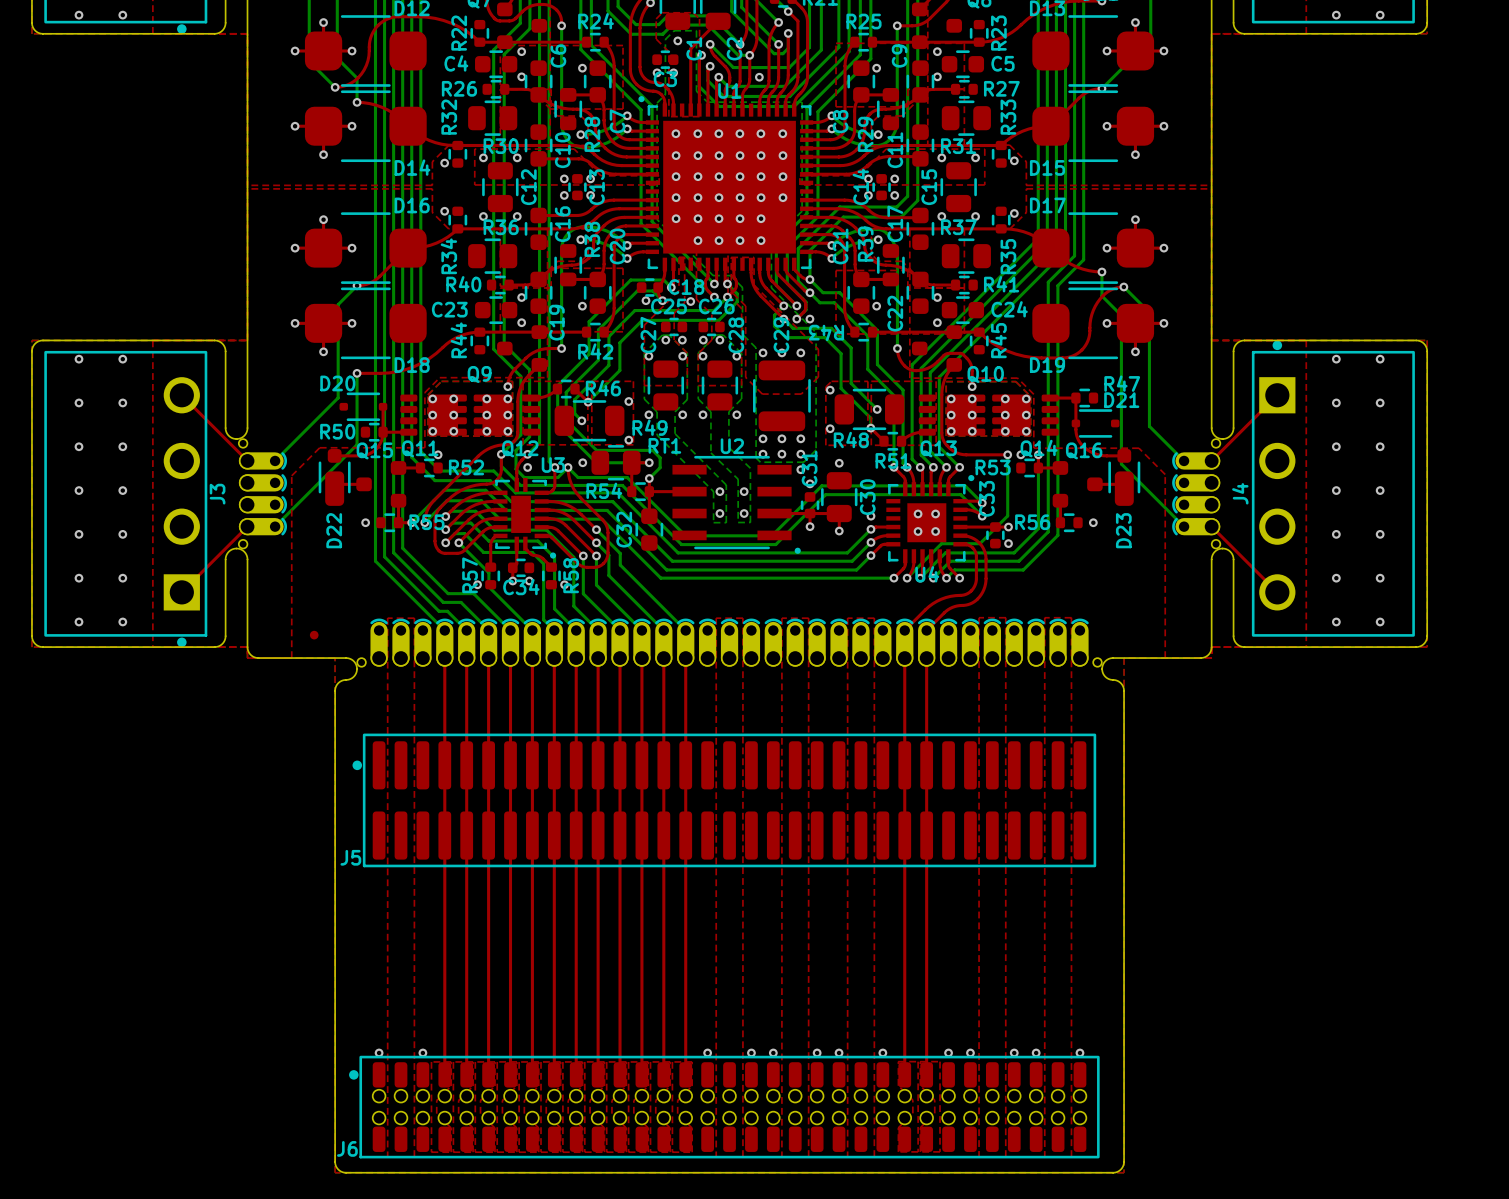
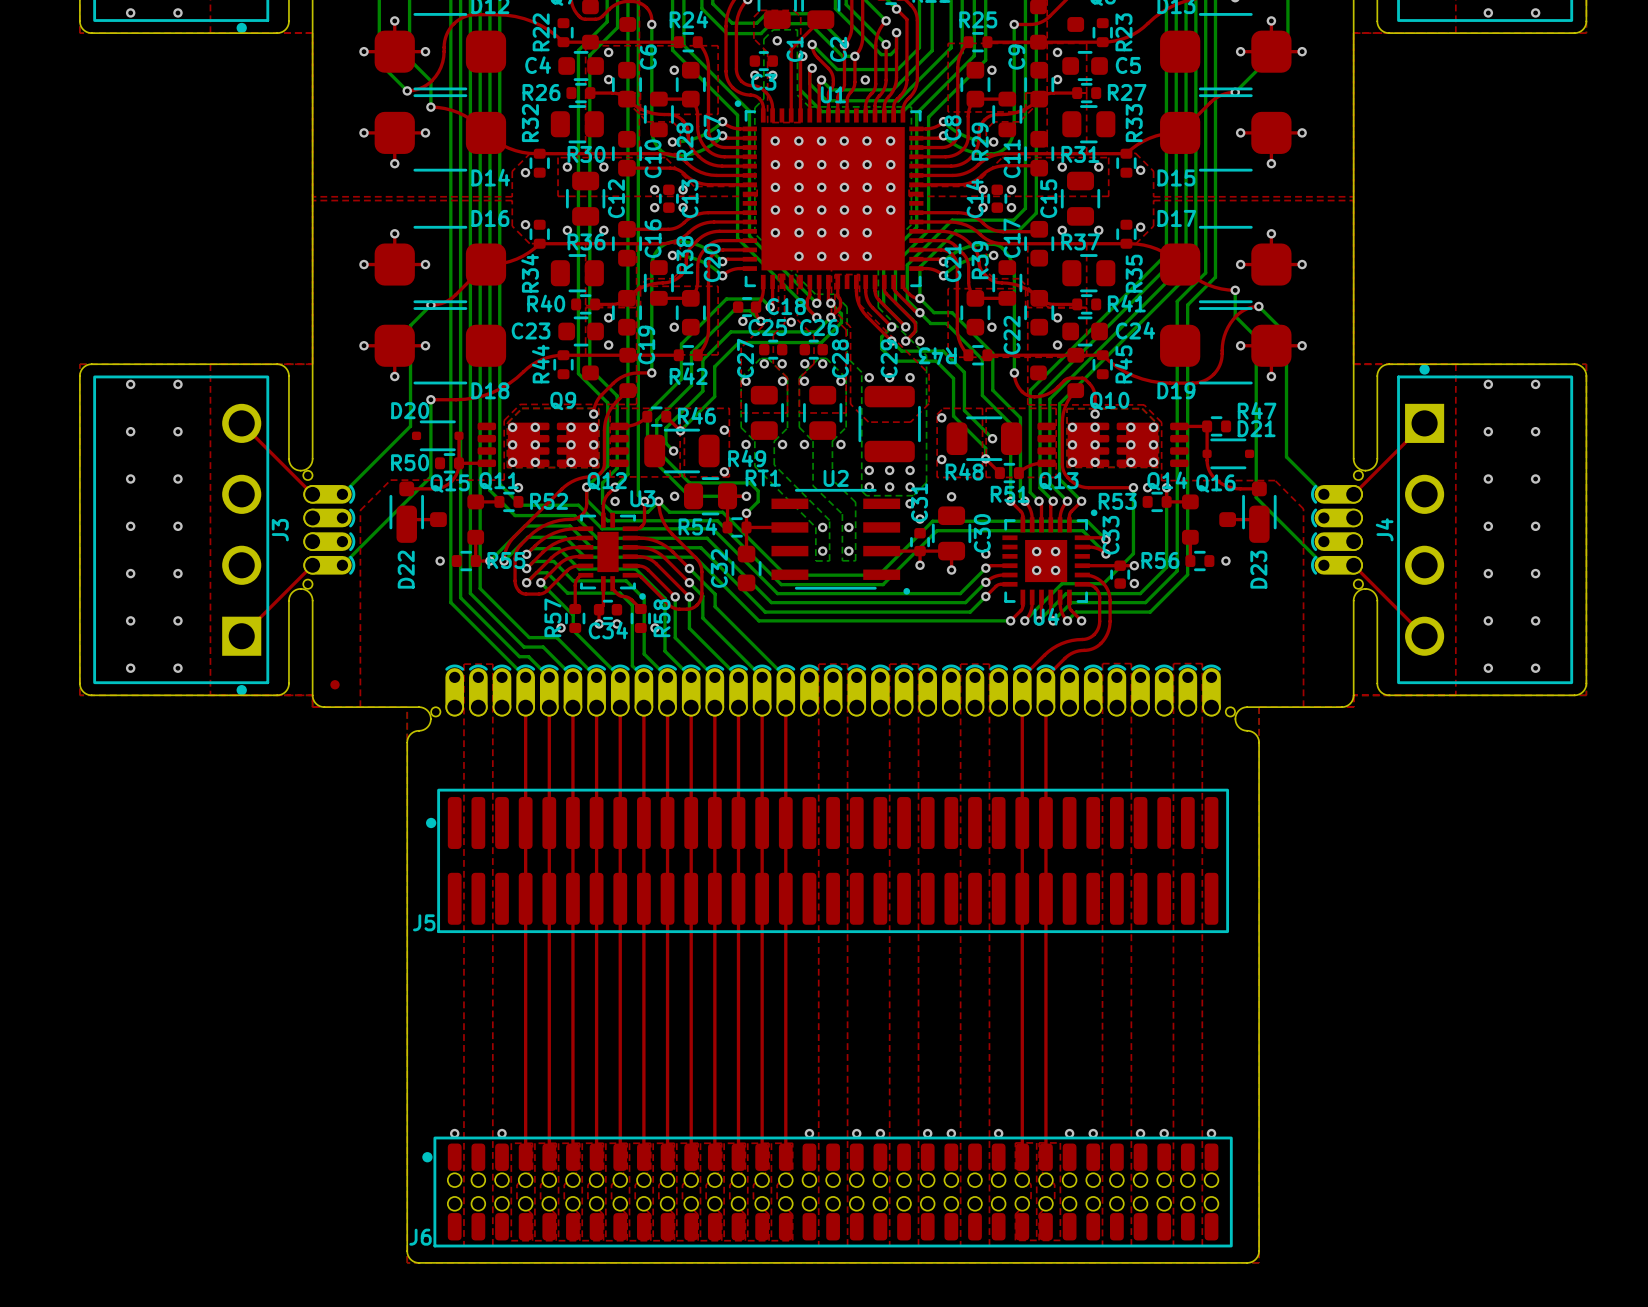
part position: (314, 635) -> (335, 684)

